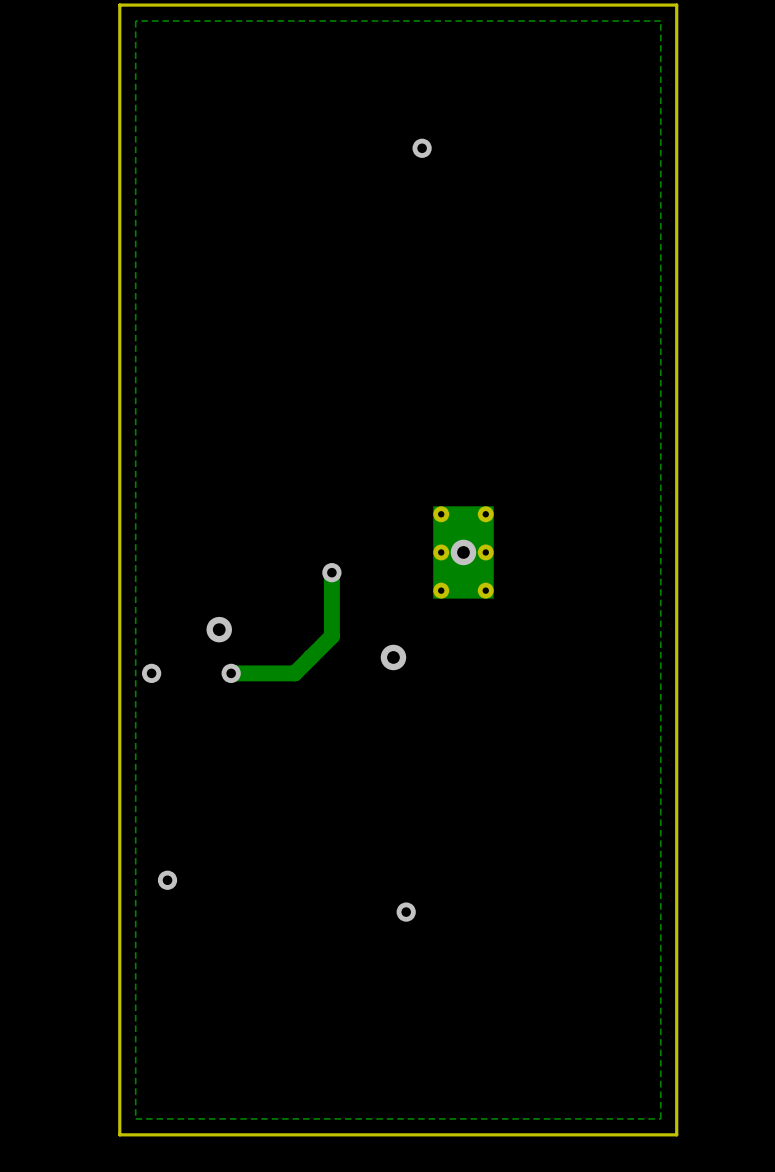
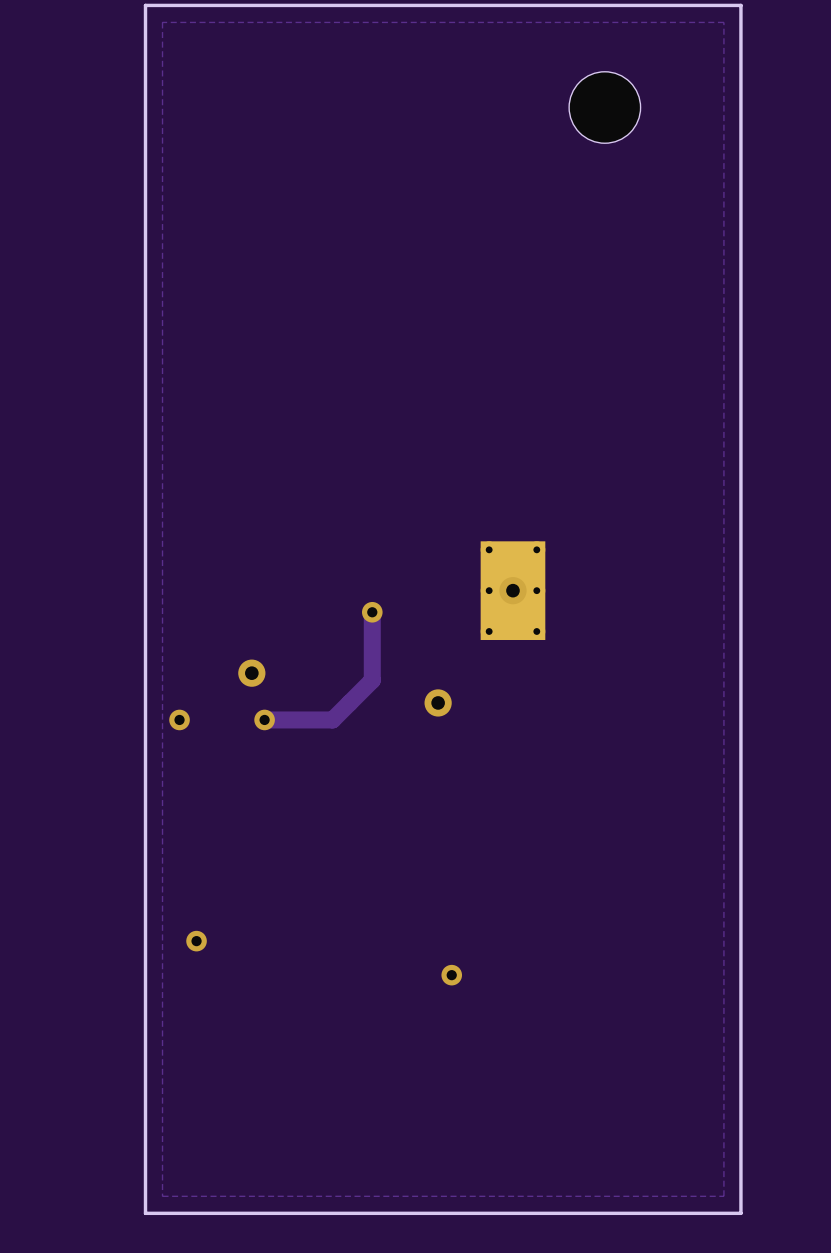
part: none -> (604, 107)
via: (422, 148) -> none

